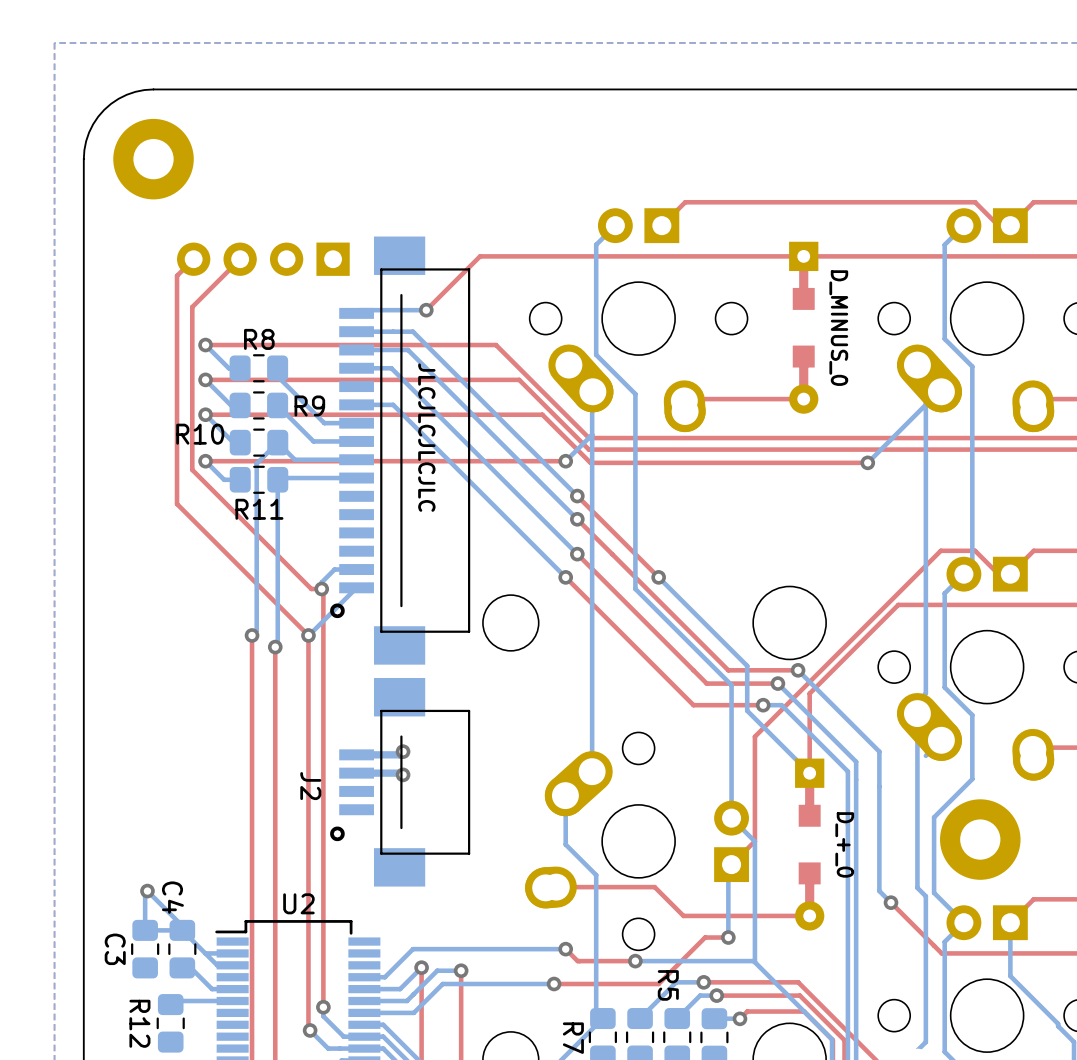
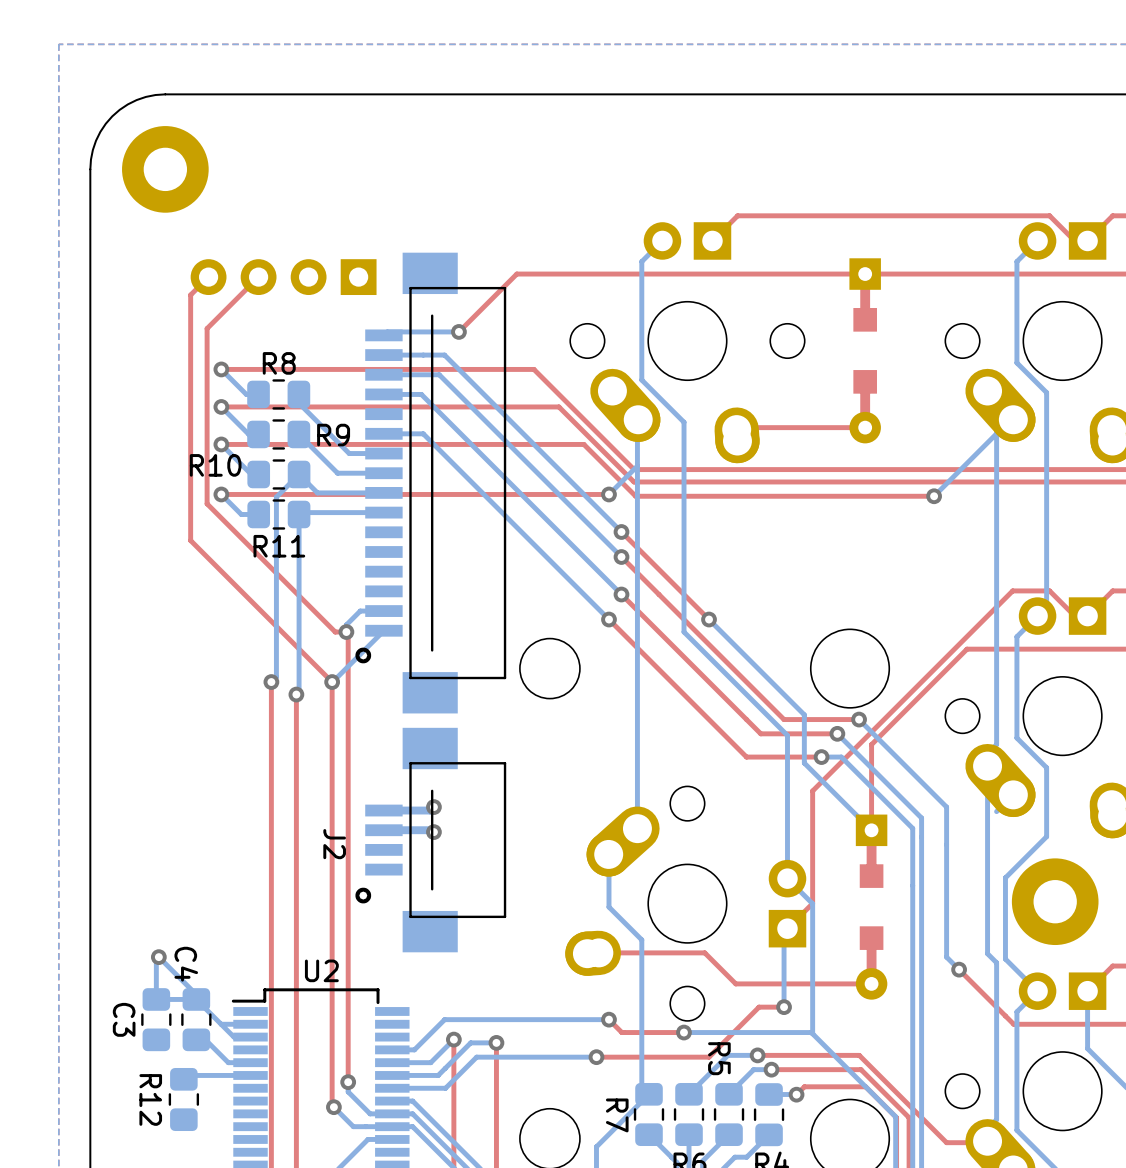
D_MINUS_0 name: D_MINUS_0 (838, 328) -> none
text: JLCJLCJLCJLC (426, 437) -> none
D_+_0 name: D_+_0 (844, 844) -> none

